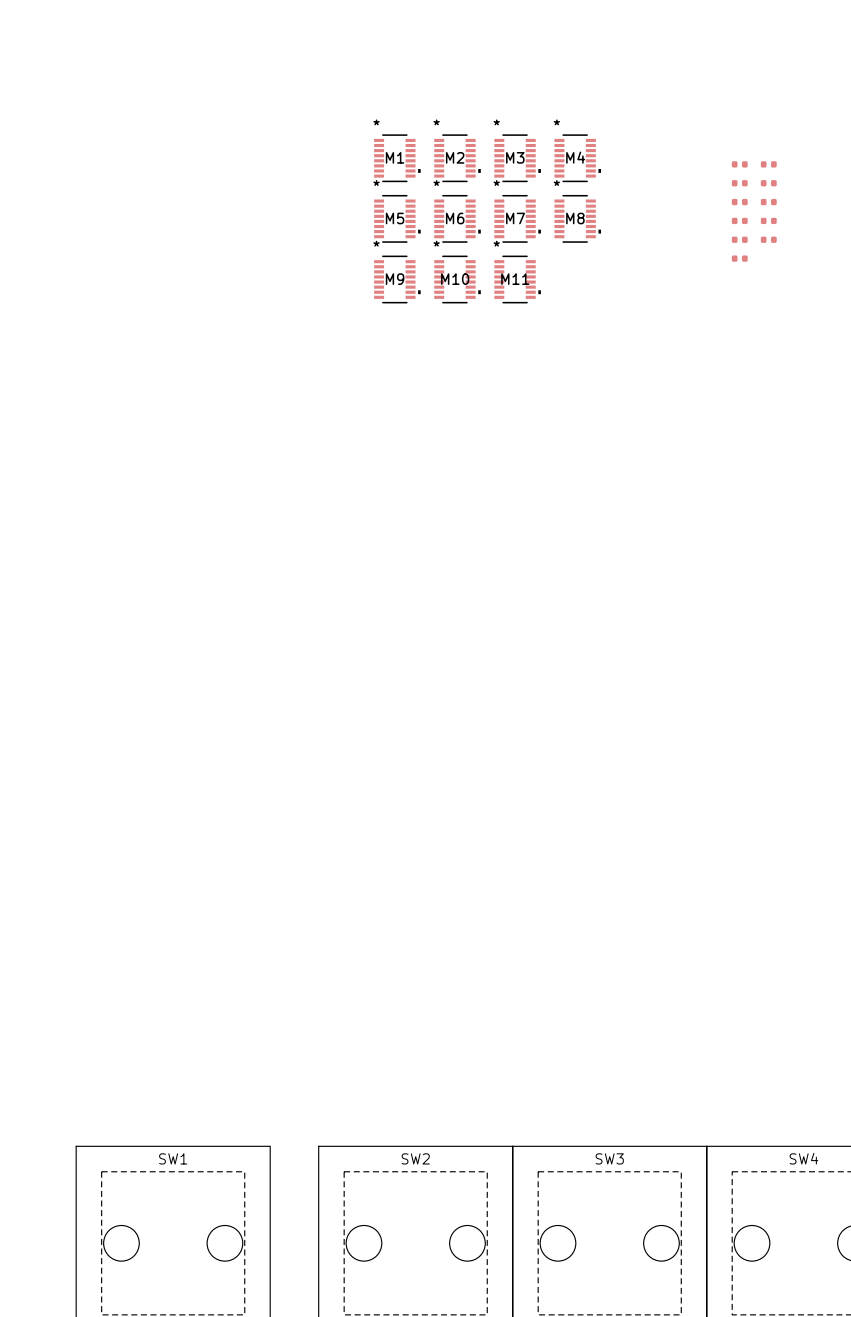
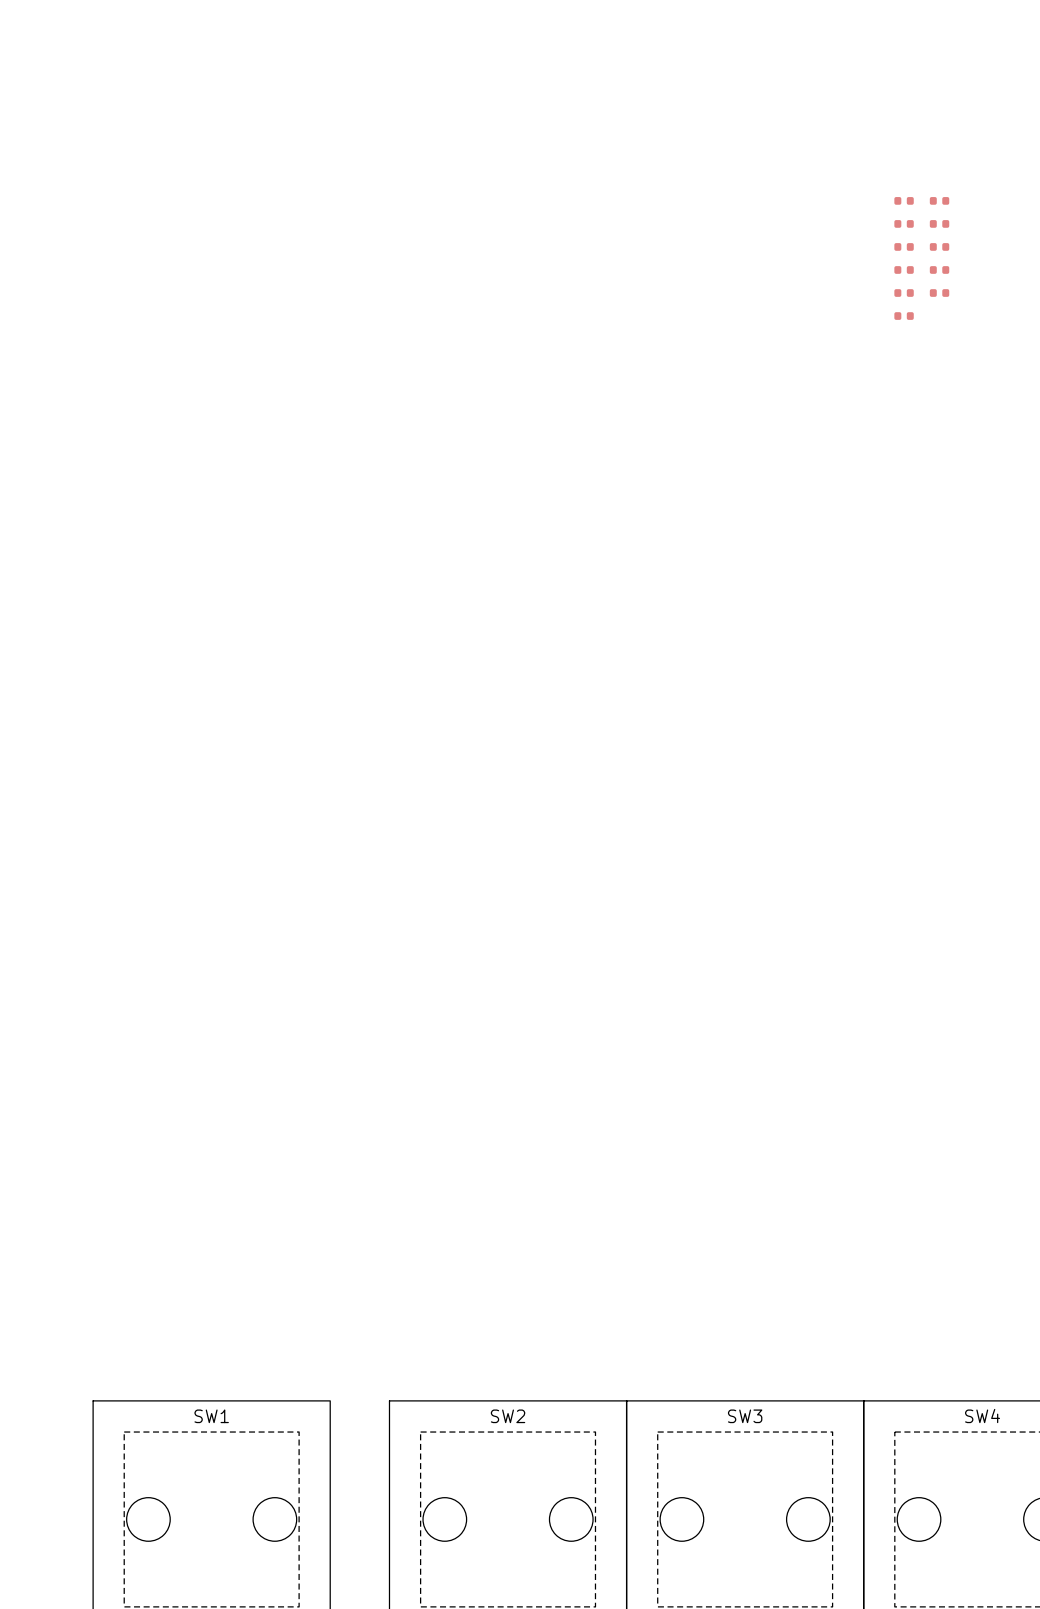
M1: (397, 158) -> none
M2: (457, 158) -> none
M3: (517, 158) -> none
M4: (577, 158) -> none
M5: (397, 218) -> none
M6: (457, 218) -> none
M7: (517, 218) -> none
M8: (577, 218) -> none
M9: (397, 279) -> none
M10: (457, 279) -> none
M11: (517, 279) -> none

